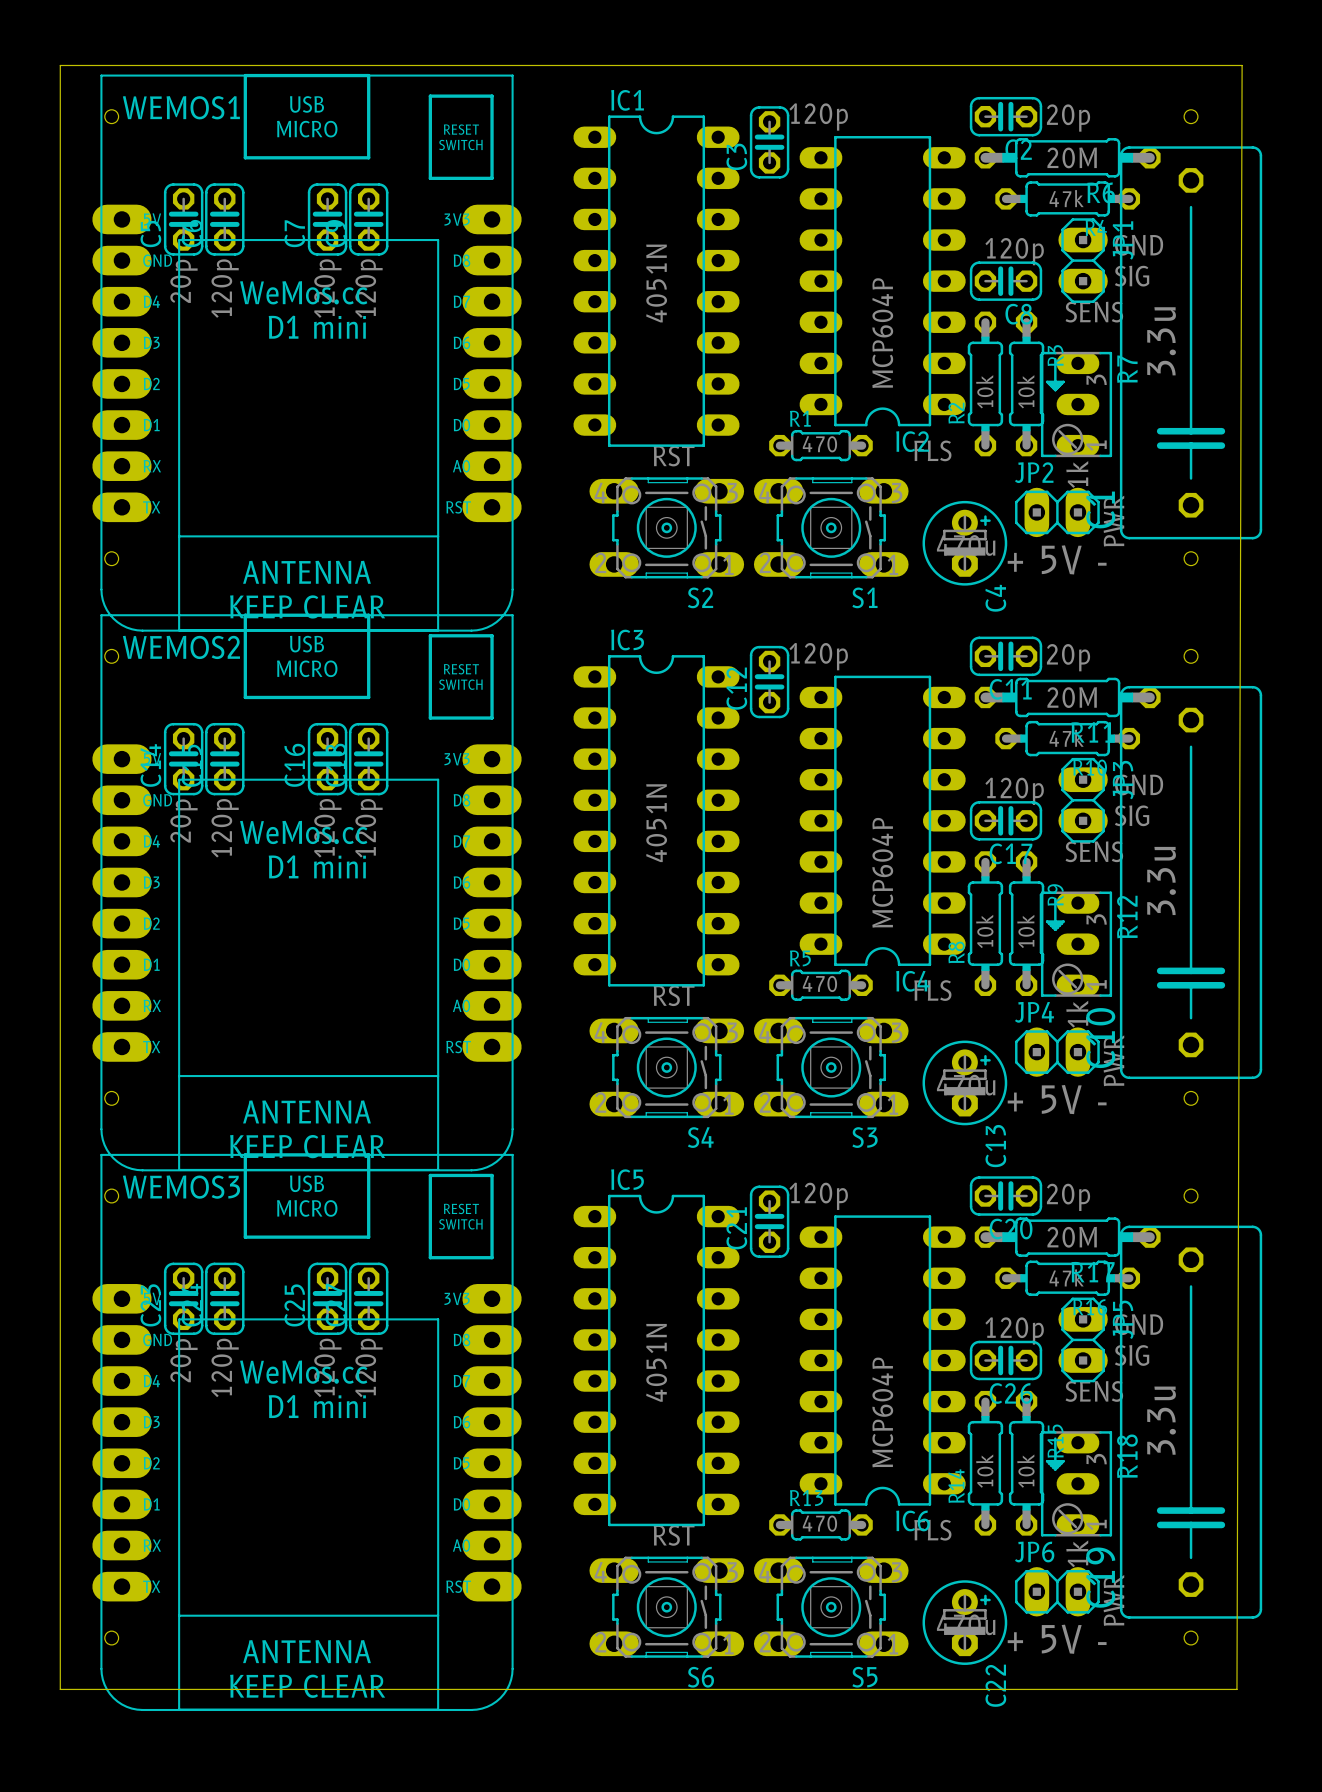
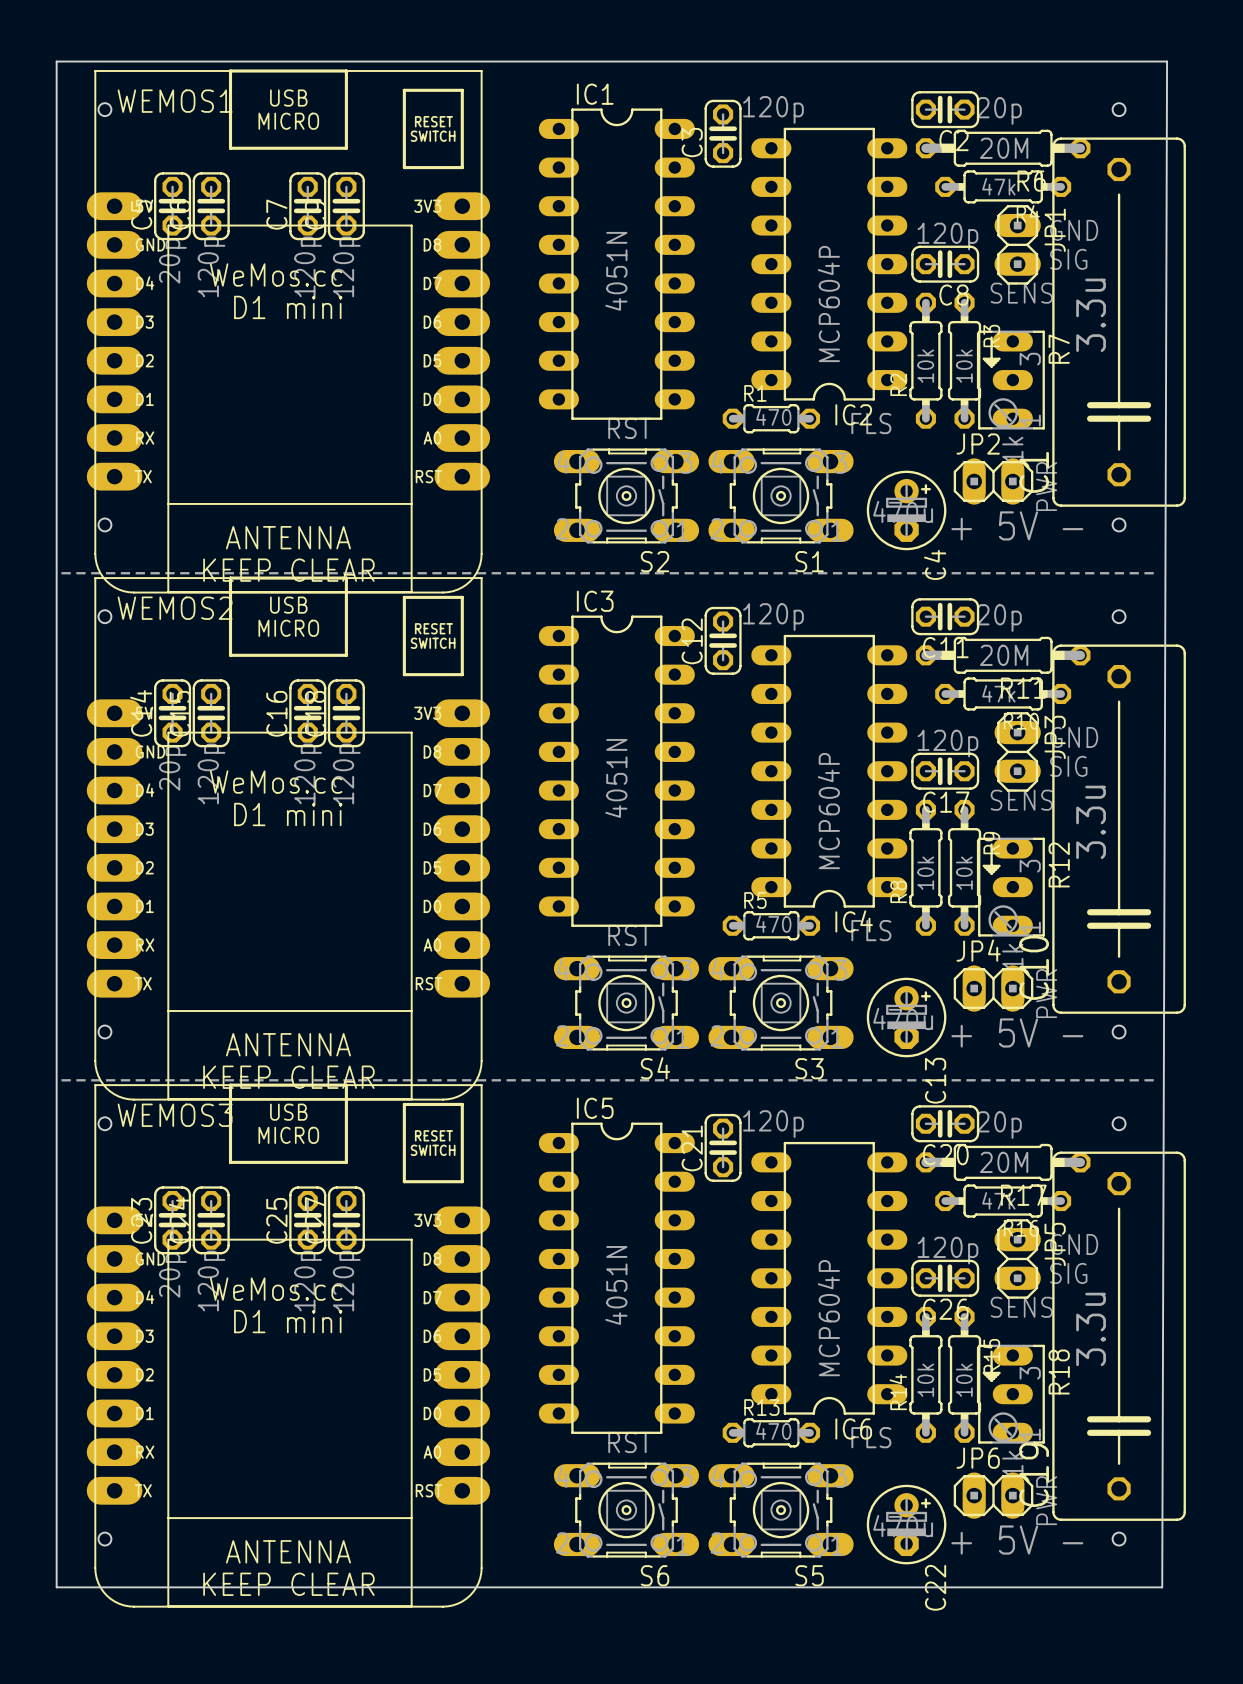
line: none -> (61, 573) (1157, 573)
line: none -> (61, 1080) (1157, 1080)

